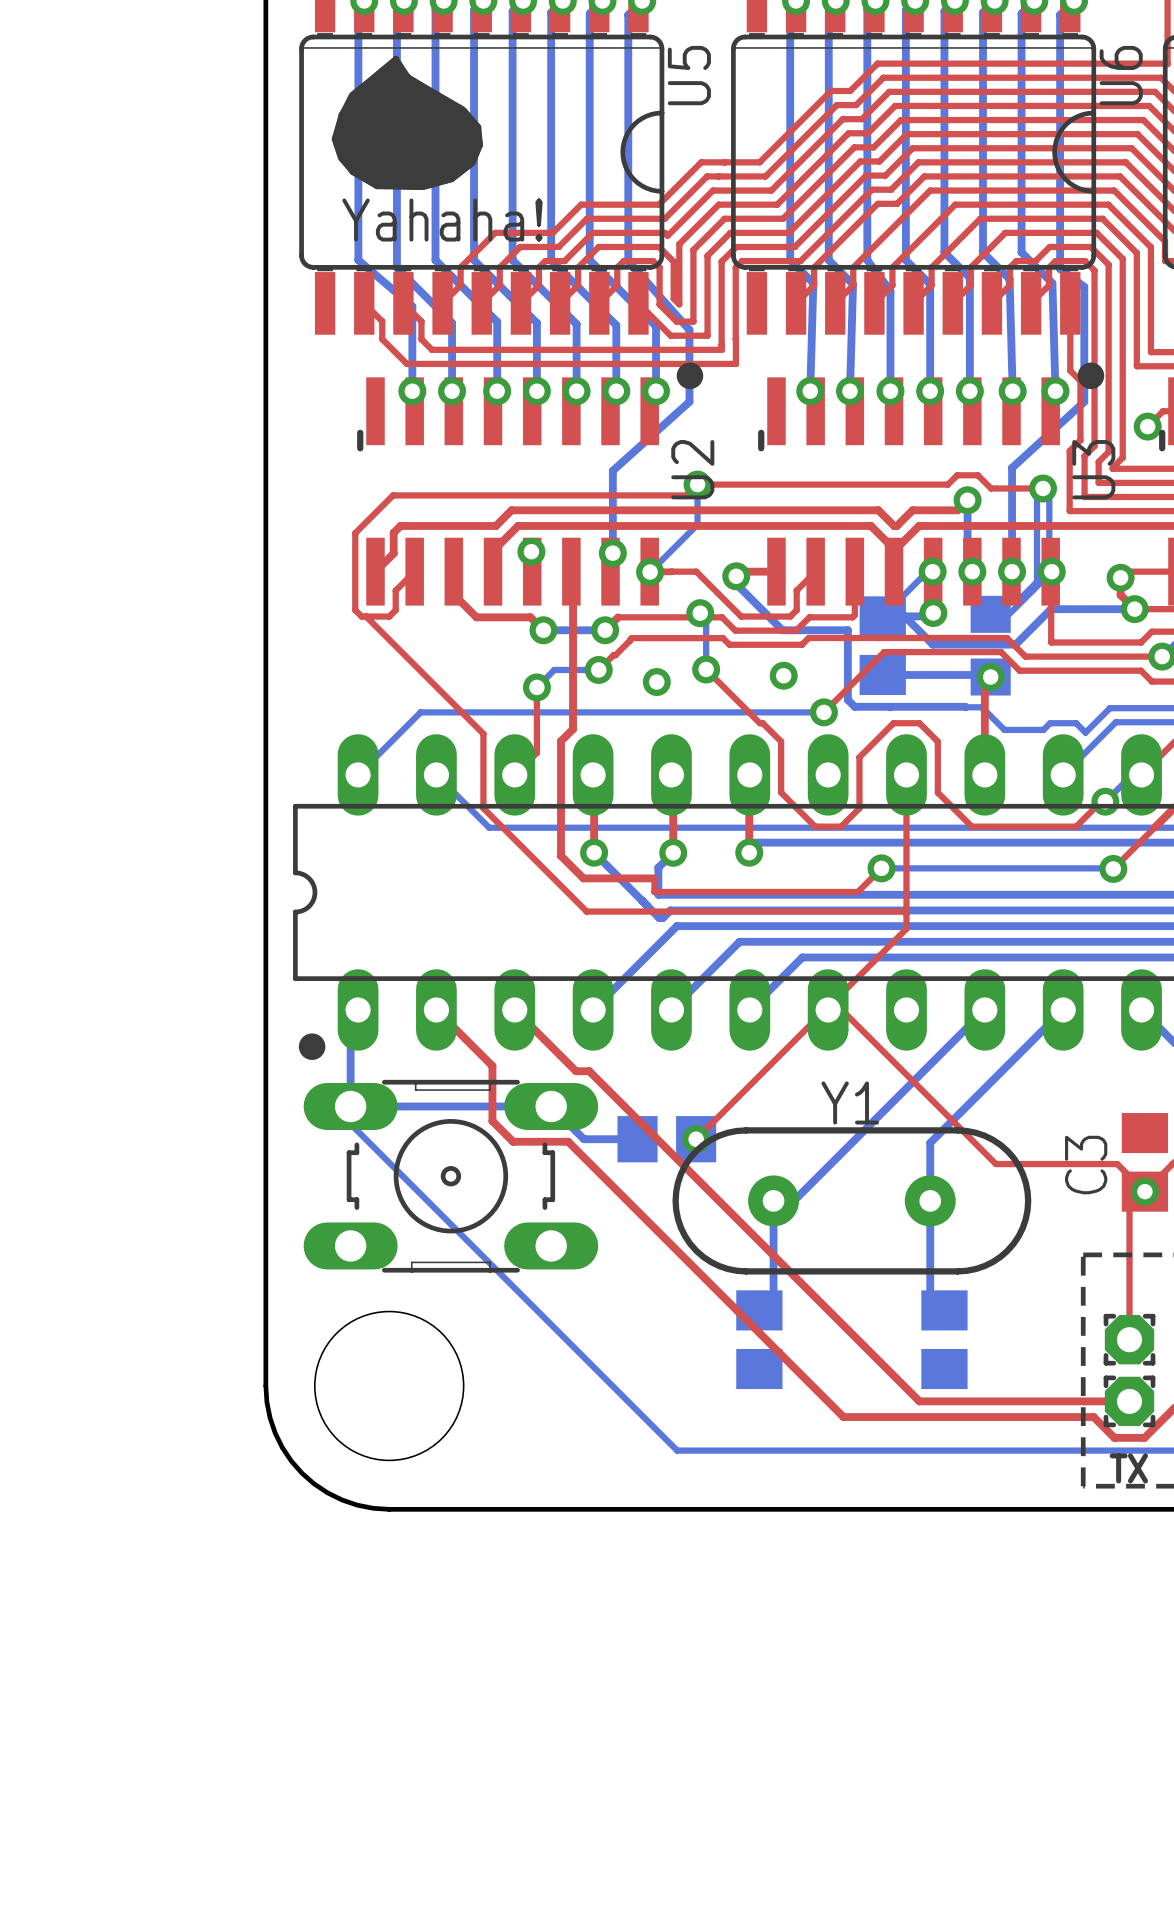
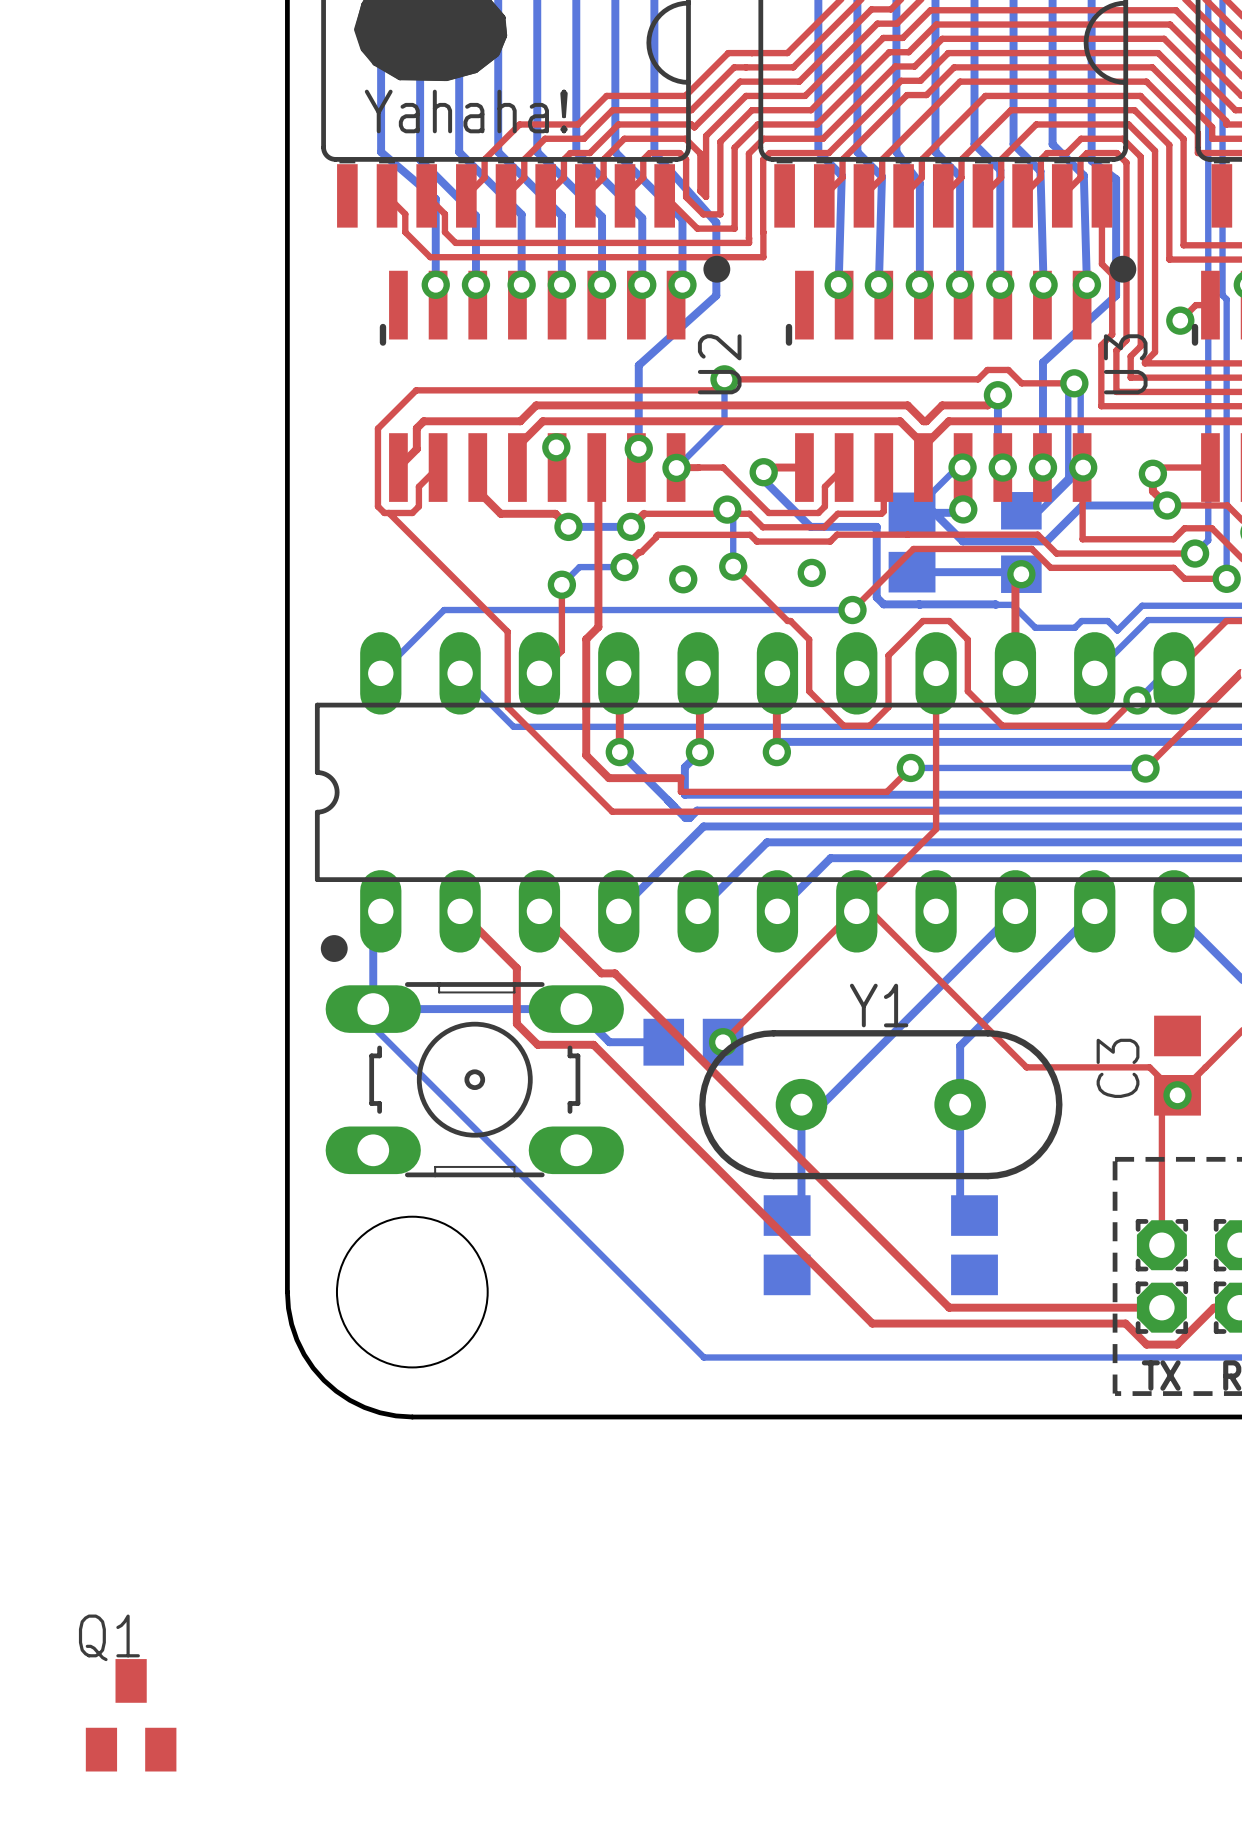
Q1: none -> (131, 1715)

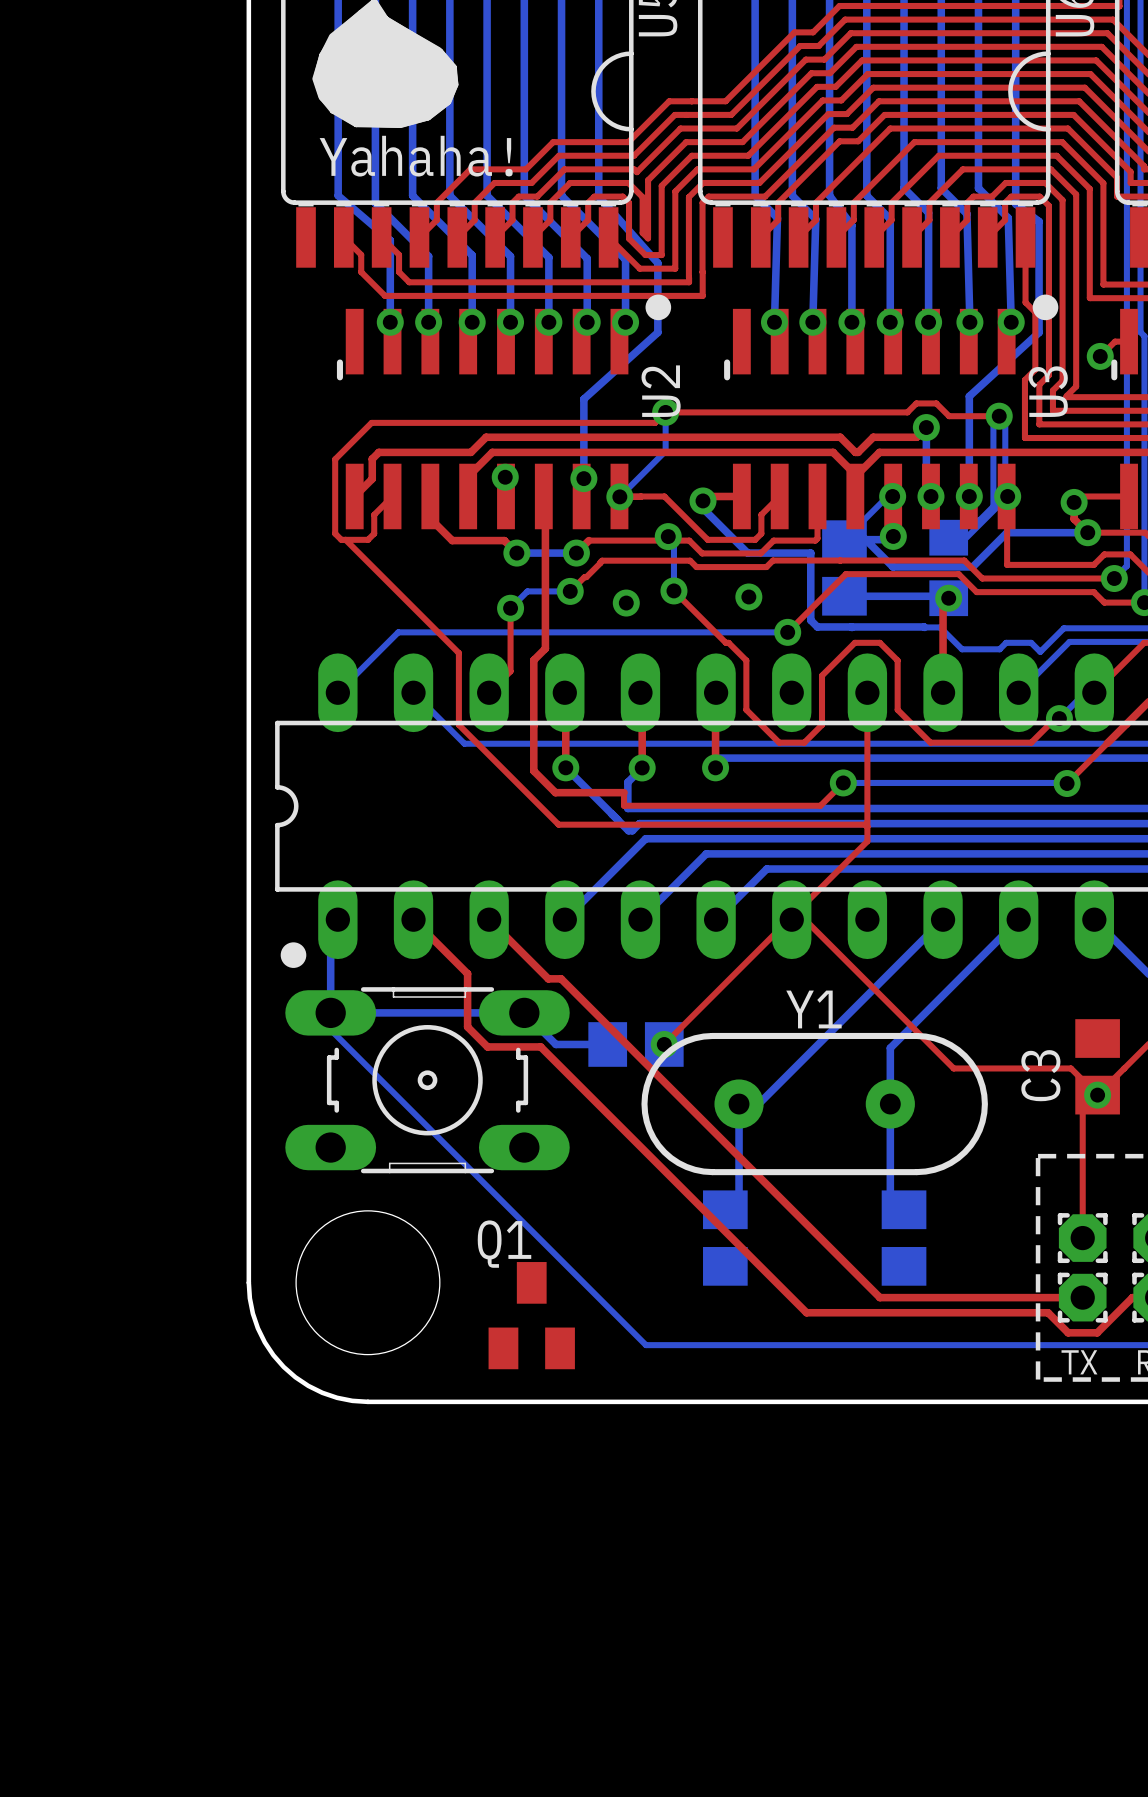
Q1 position: (131, 1715) -> (531, 1315)

